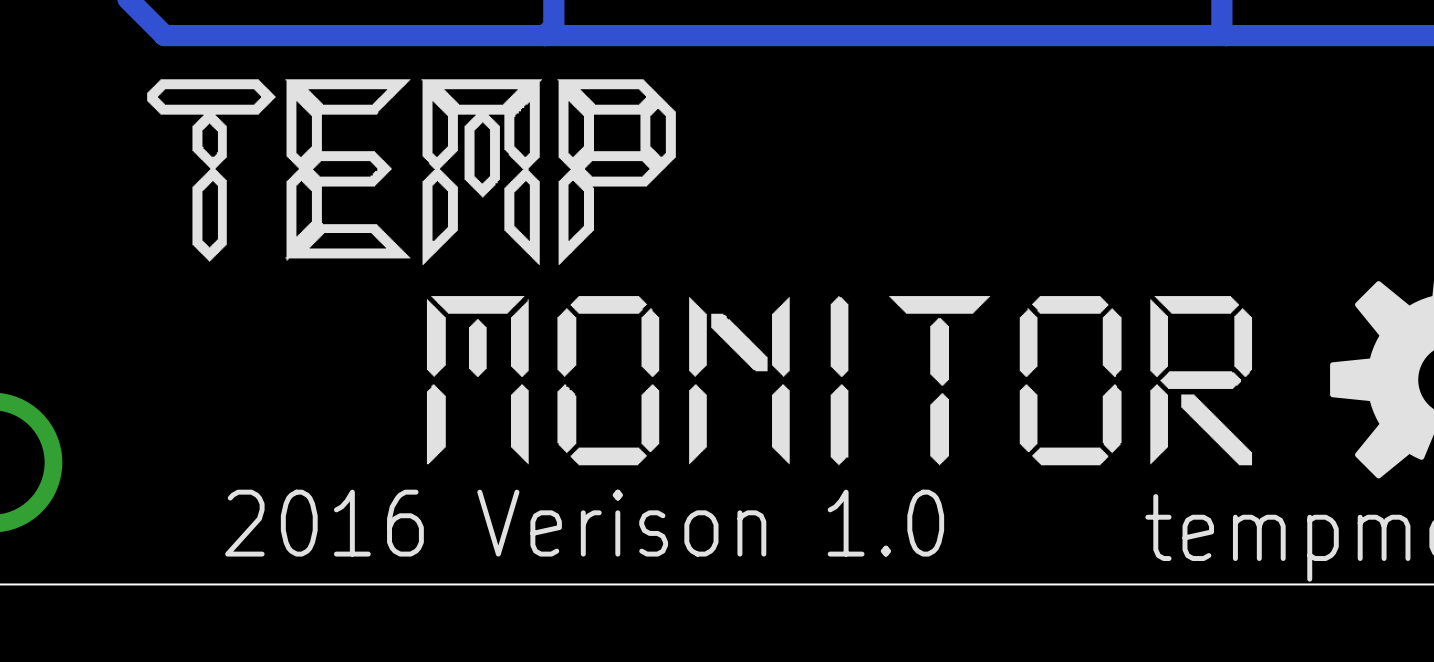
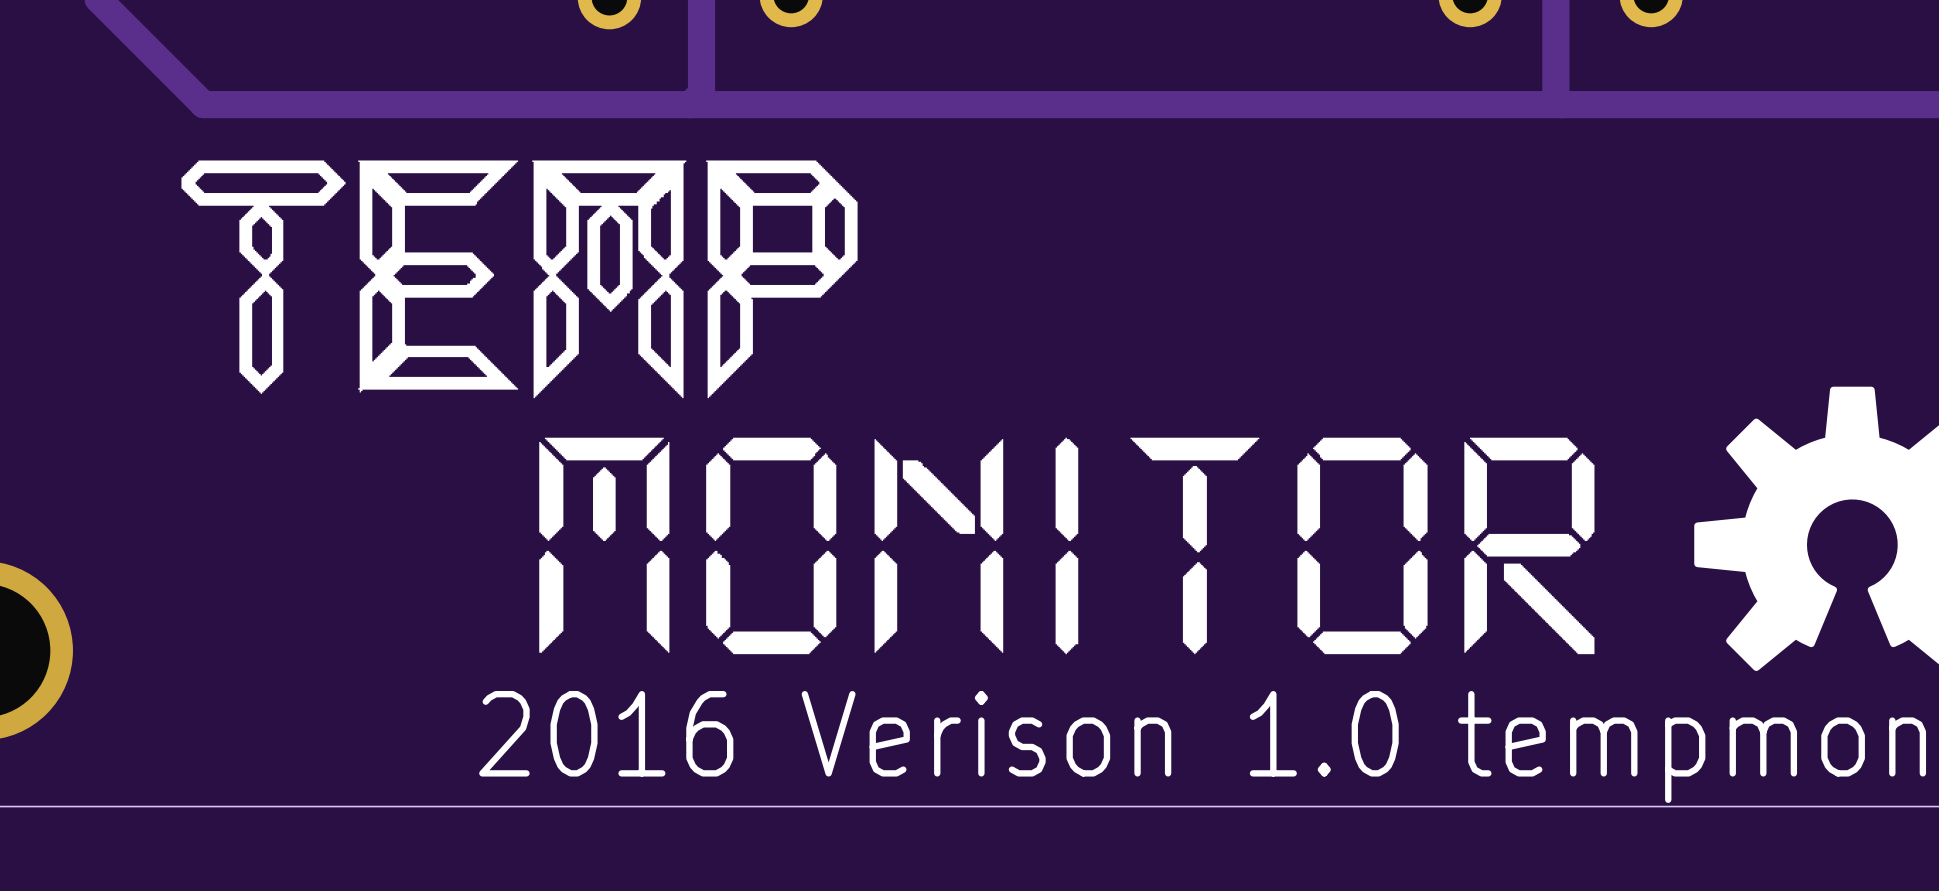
text position: 2016 Verison 1.0 (584, 523) -> 2016 Verison 1.0 (938, 733)

